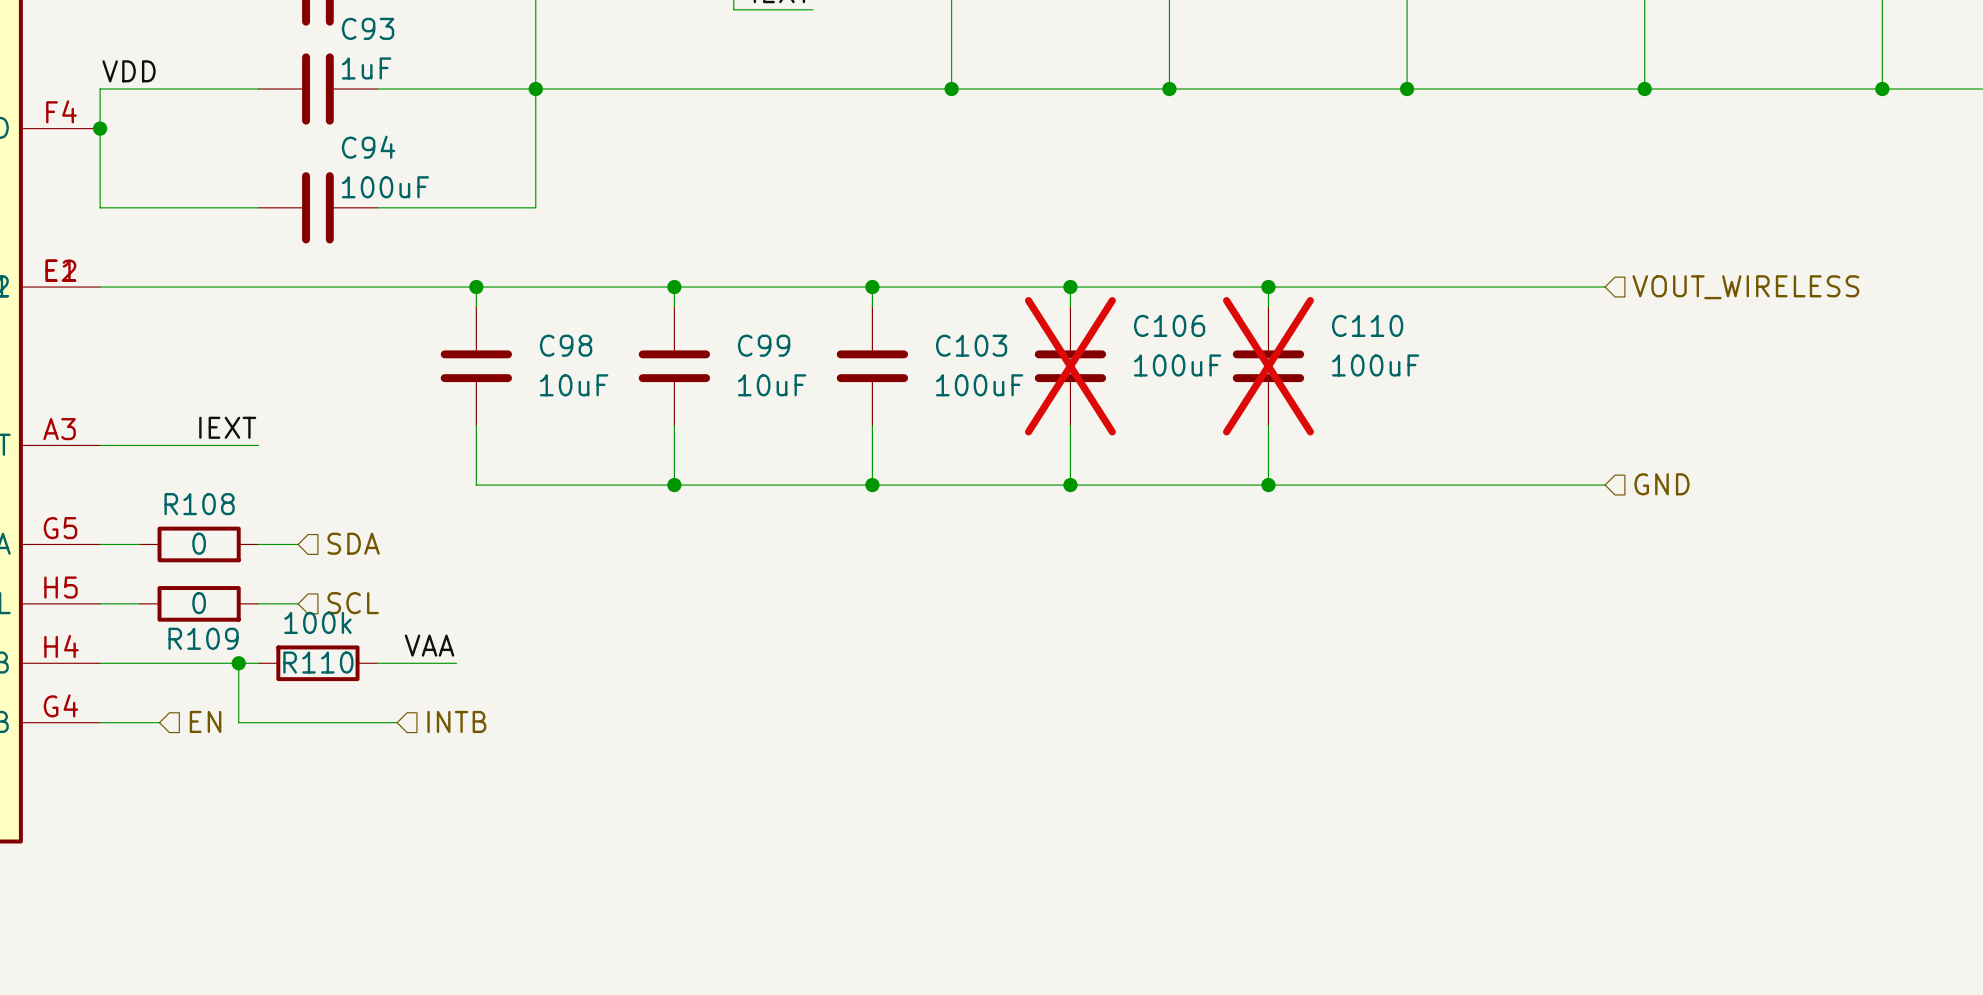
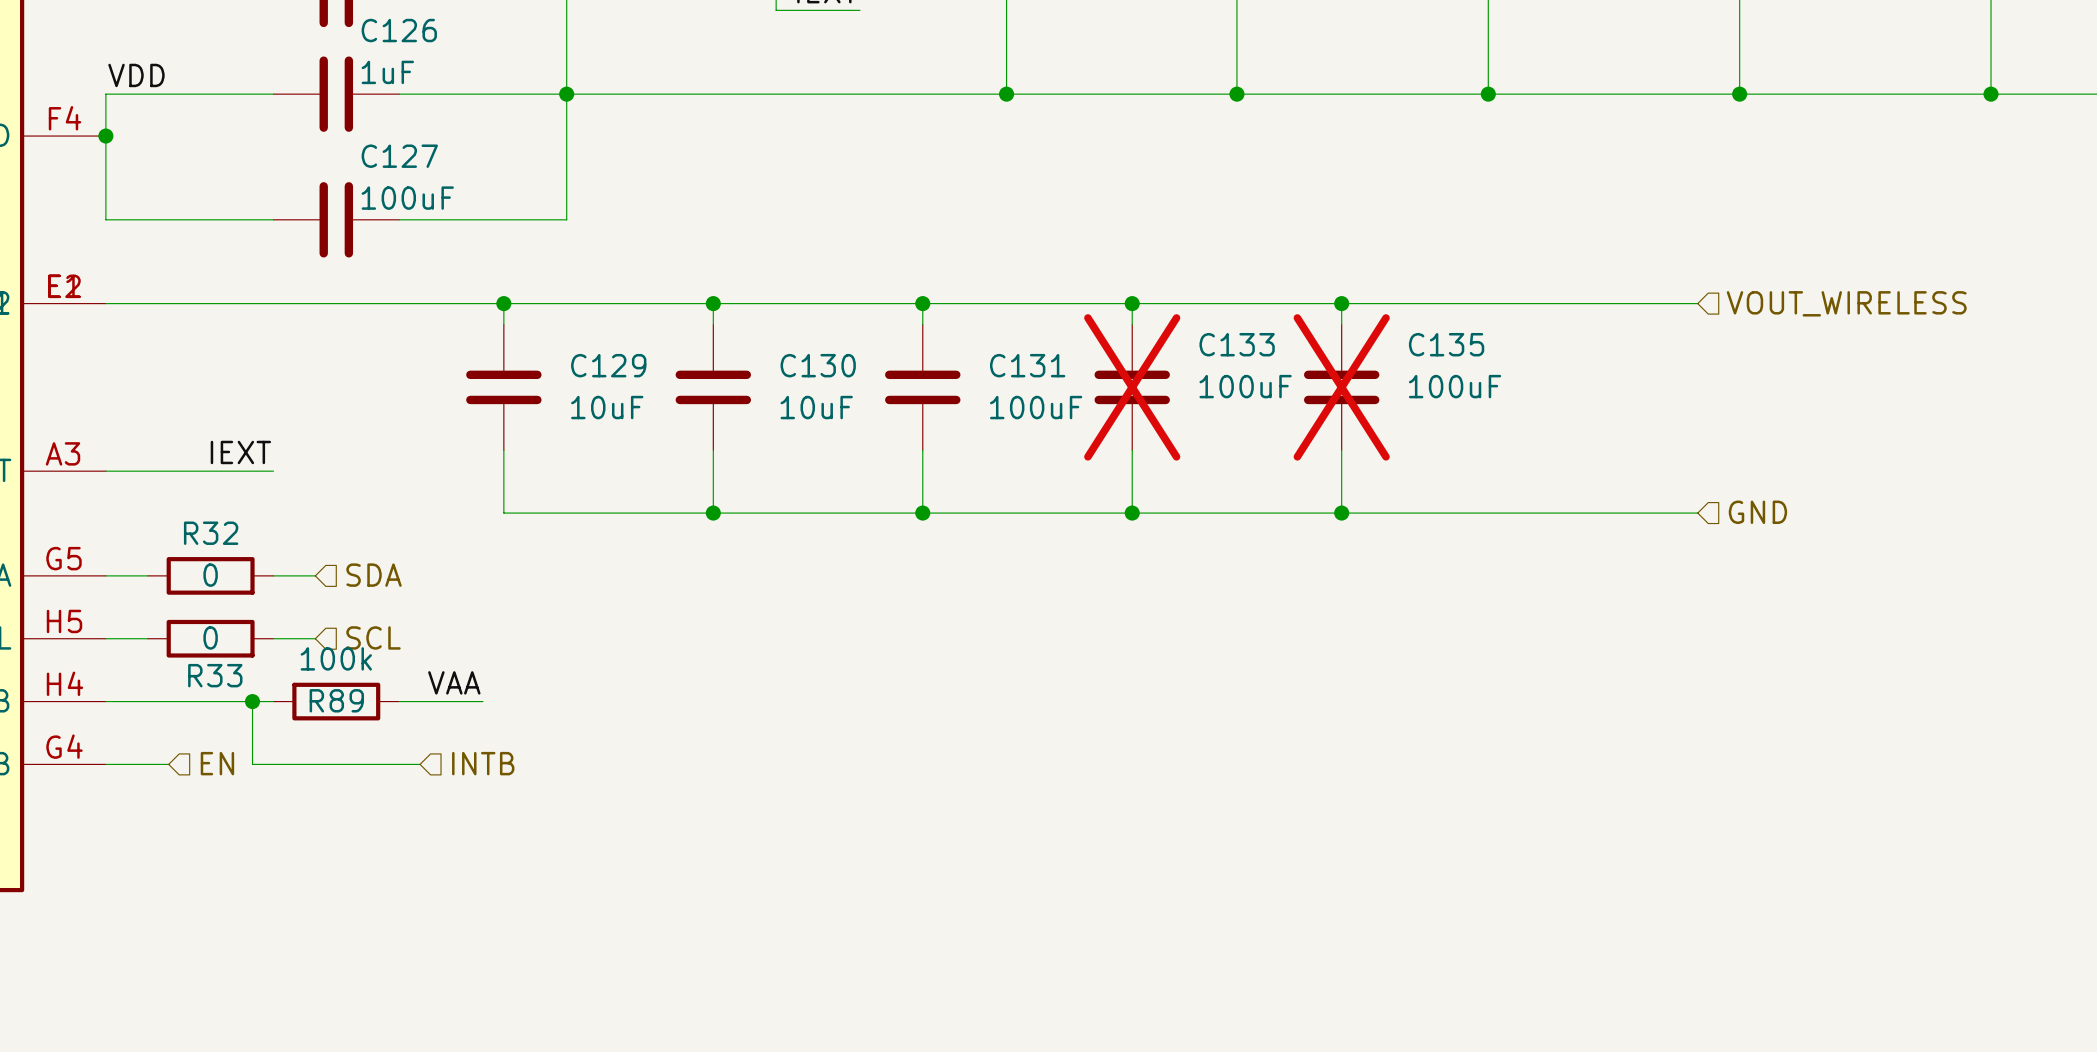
C93 name: C93 (368, 28) -> C126 (399, 30)
C94 name: C94 (368, 147) -> C127 (399, 156)
C106 name: C106 (1169, 325) -> C133 (1237, 344)
C110 name: C110 (1367, 325) -> C135 (1446, 344)
C98 name: C98 (566, 345) -> C129 (608, 365)
C99 name: C99 (764, 345) -> C130 (818, 365)
C103 name: C103 (971, 345) -> C131 (1027, 365)
R108 name: R108 (199, 504) -> R32 (211, 533)
R109 name: R109 (203, 638) -> R33 (215, 675)
R110 name: R110 (318, 662) -> R89 (336, 700)

